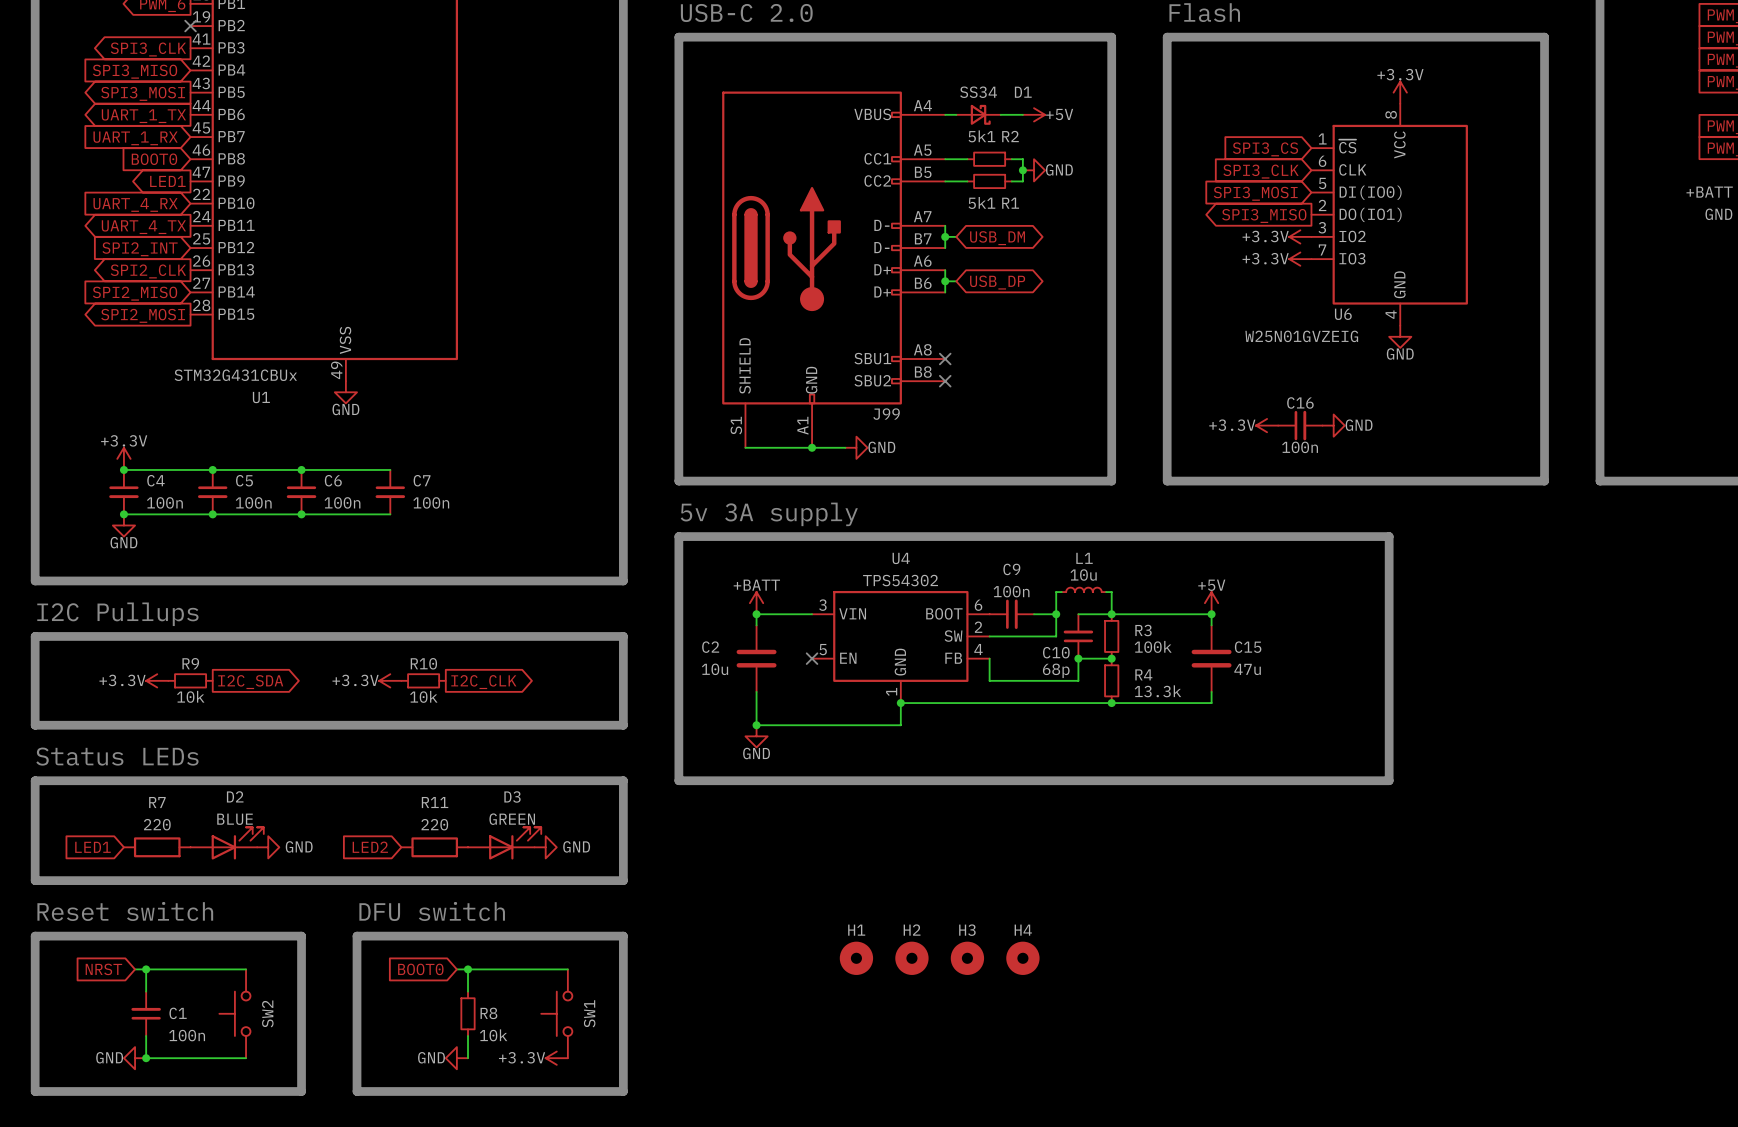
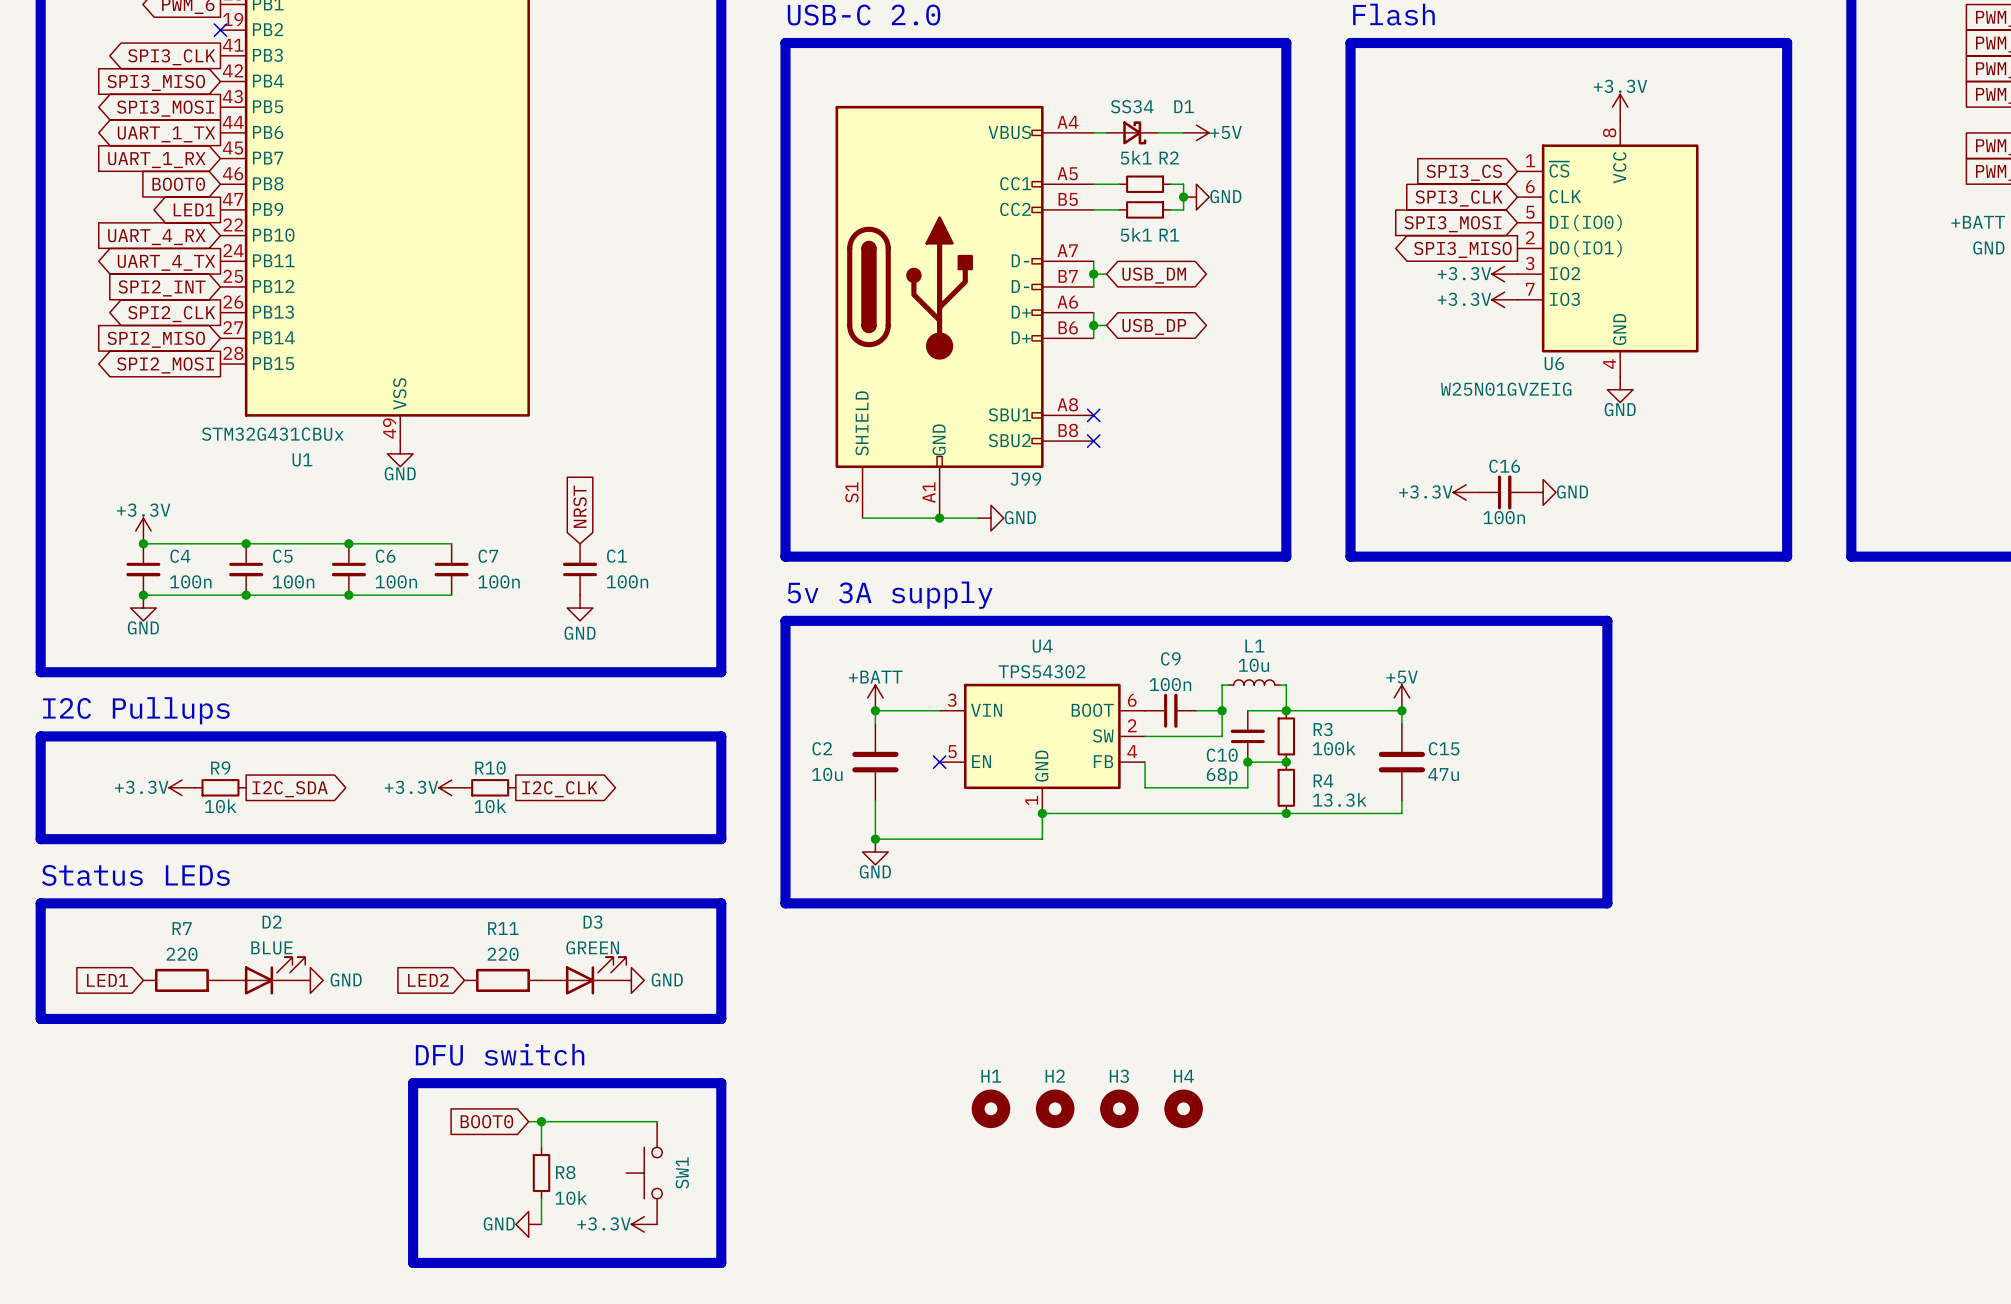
global label: none -> NRST (580, 506)
power symbol: none -> GND (580, 608)
text: Reset switch (125, 911) -> none
line: (35, 936) (301, 936) (301, 1091) (35, 1091) (35, 936) -> none
global label: NRST (103, 969) -> none
wire: (135, 969) (246, 969) -> none
wire: (146, 969) (146, 991) -> none
junction: (146, 969) -> none
C1 position: (146, 1013) -> (580, 569)
C1 name position: C1 (178, 1013) -> C1 (616, 556)
SW2: (234, 1013) -> none
wire: (146, 1035) (146, 1058) (246, 1058) -> none
C1 value position: 100n (187, 1035) -> 100n (627, 581)
power symbol: GND (135, 1058) -> none
junction: (146, 1058) -> none

